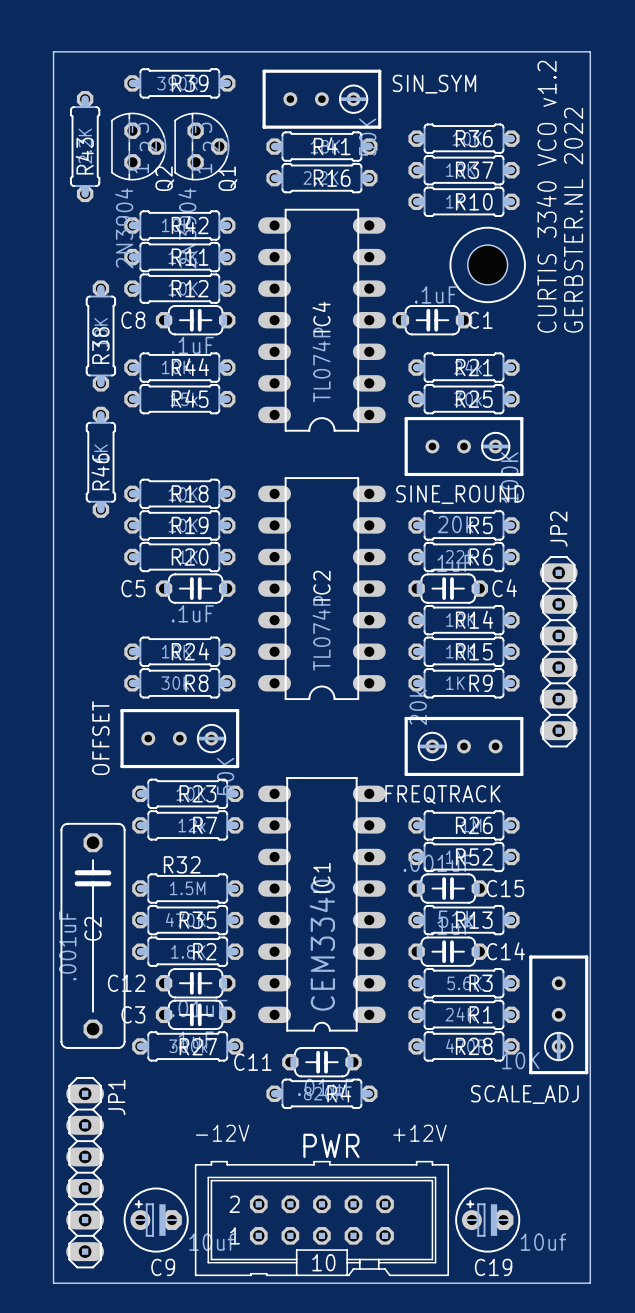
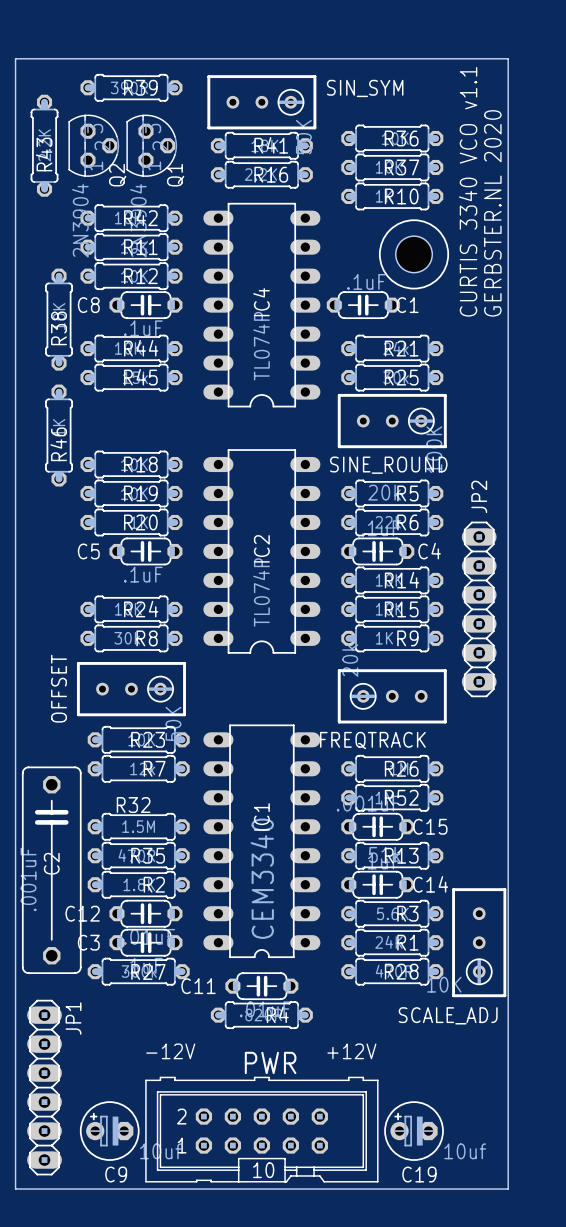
text: CURTIS 3340 VCO v1.2 (546, 196) -> CURTIS 3340 VCO v1.1 (468, 191)
text: GERBSTER.NL 2022 (573, 220) -> GERBSTER.NL 2020 (492, 213)

